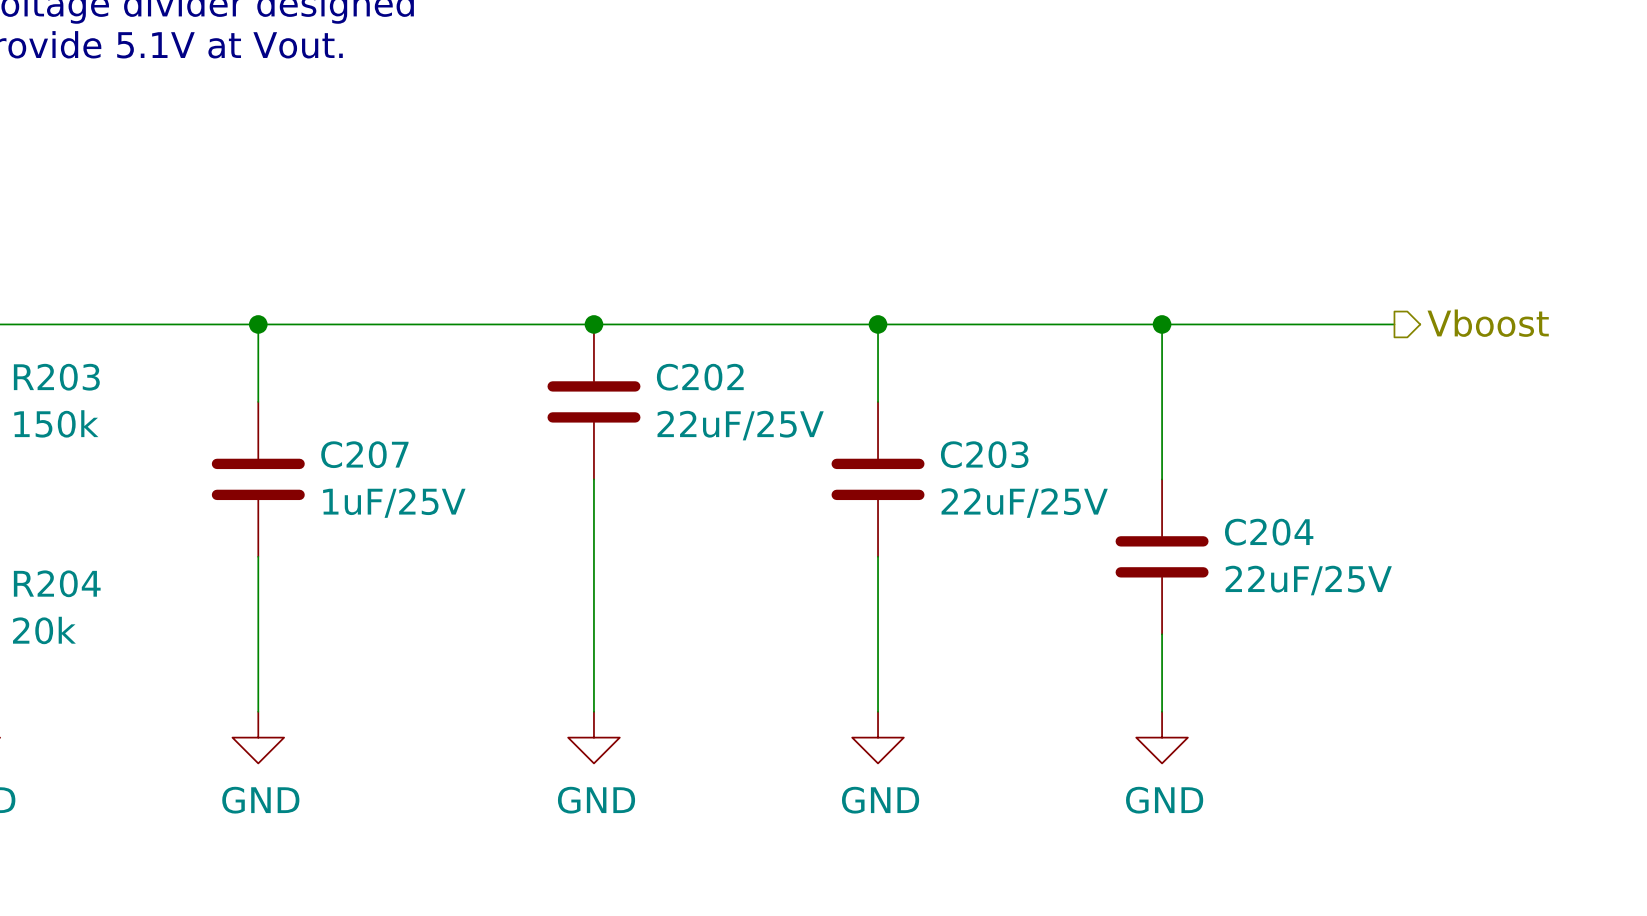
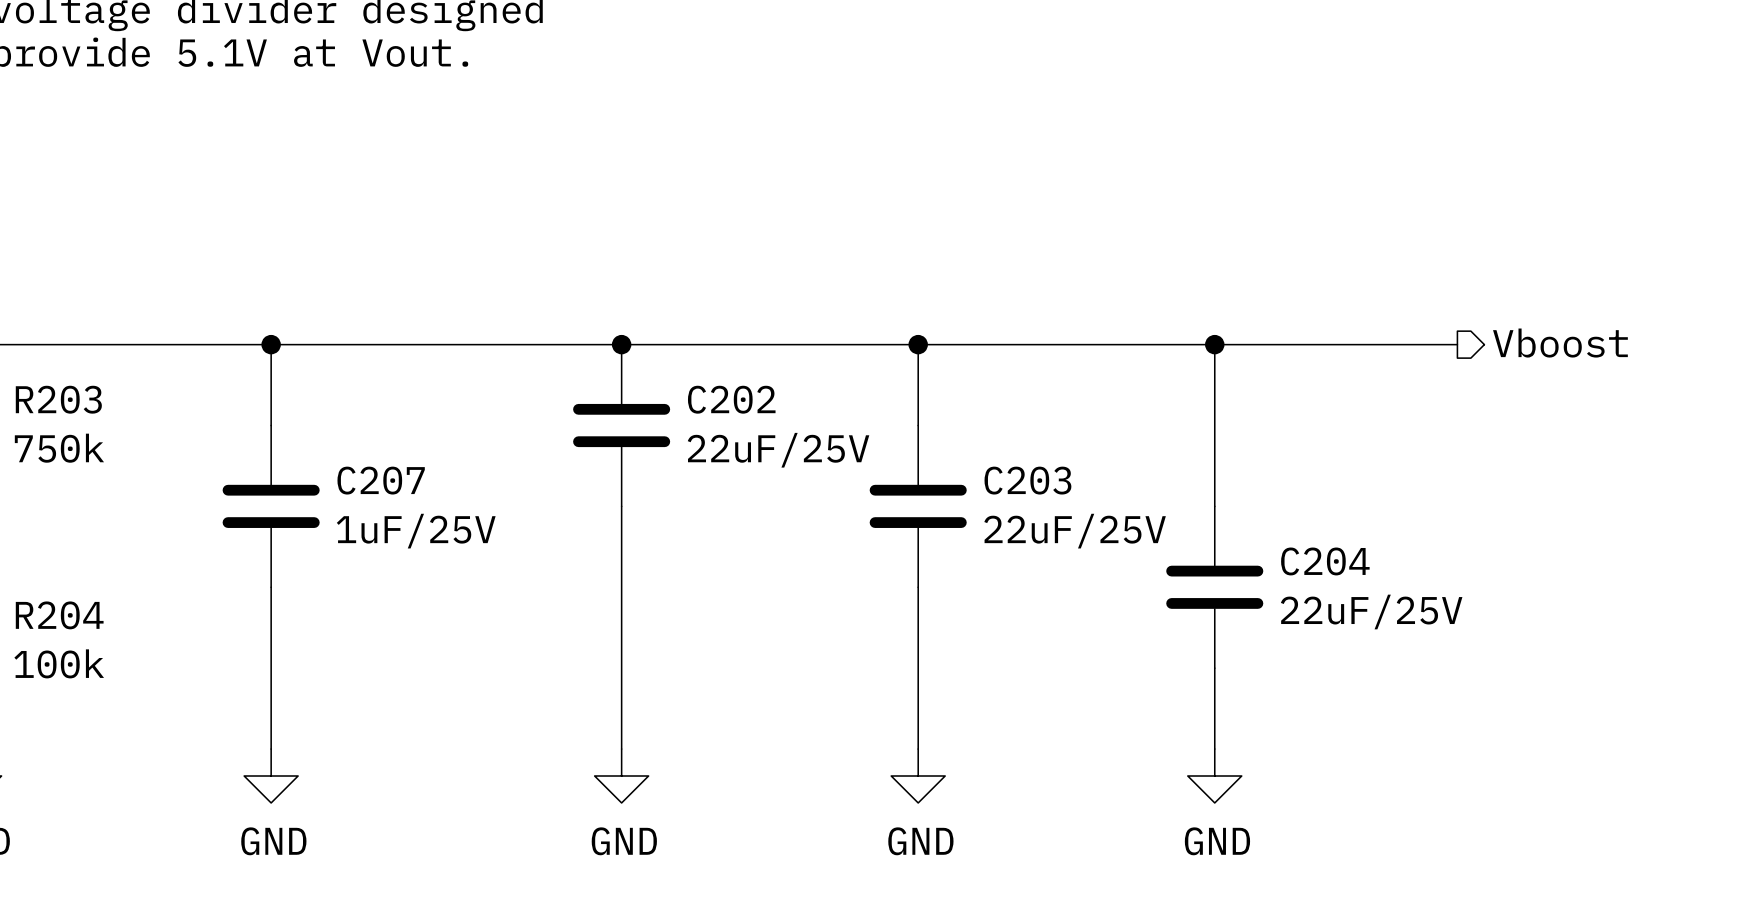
R203 value: 150k (56, 423) -> 750k (59, 448)
R204 value: 20k (44, 630) -> 100k (59, 663)

